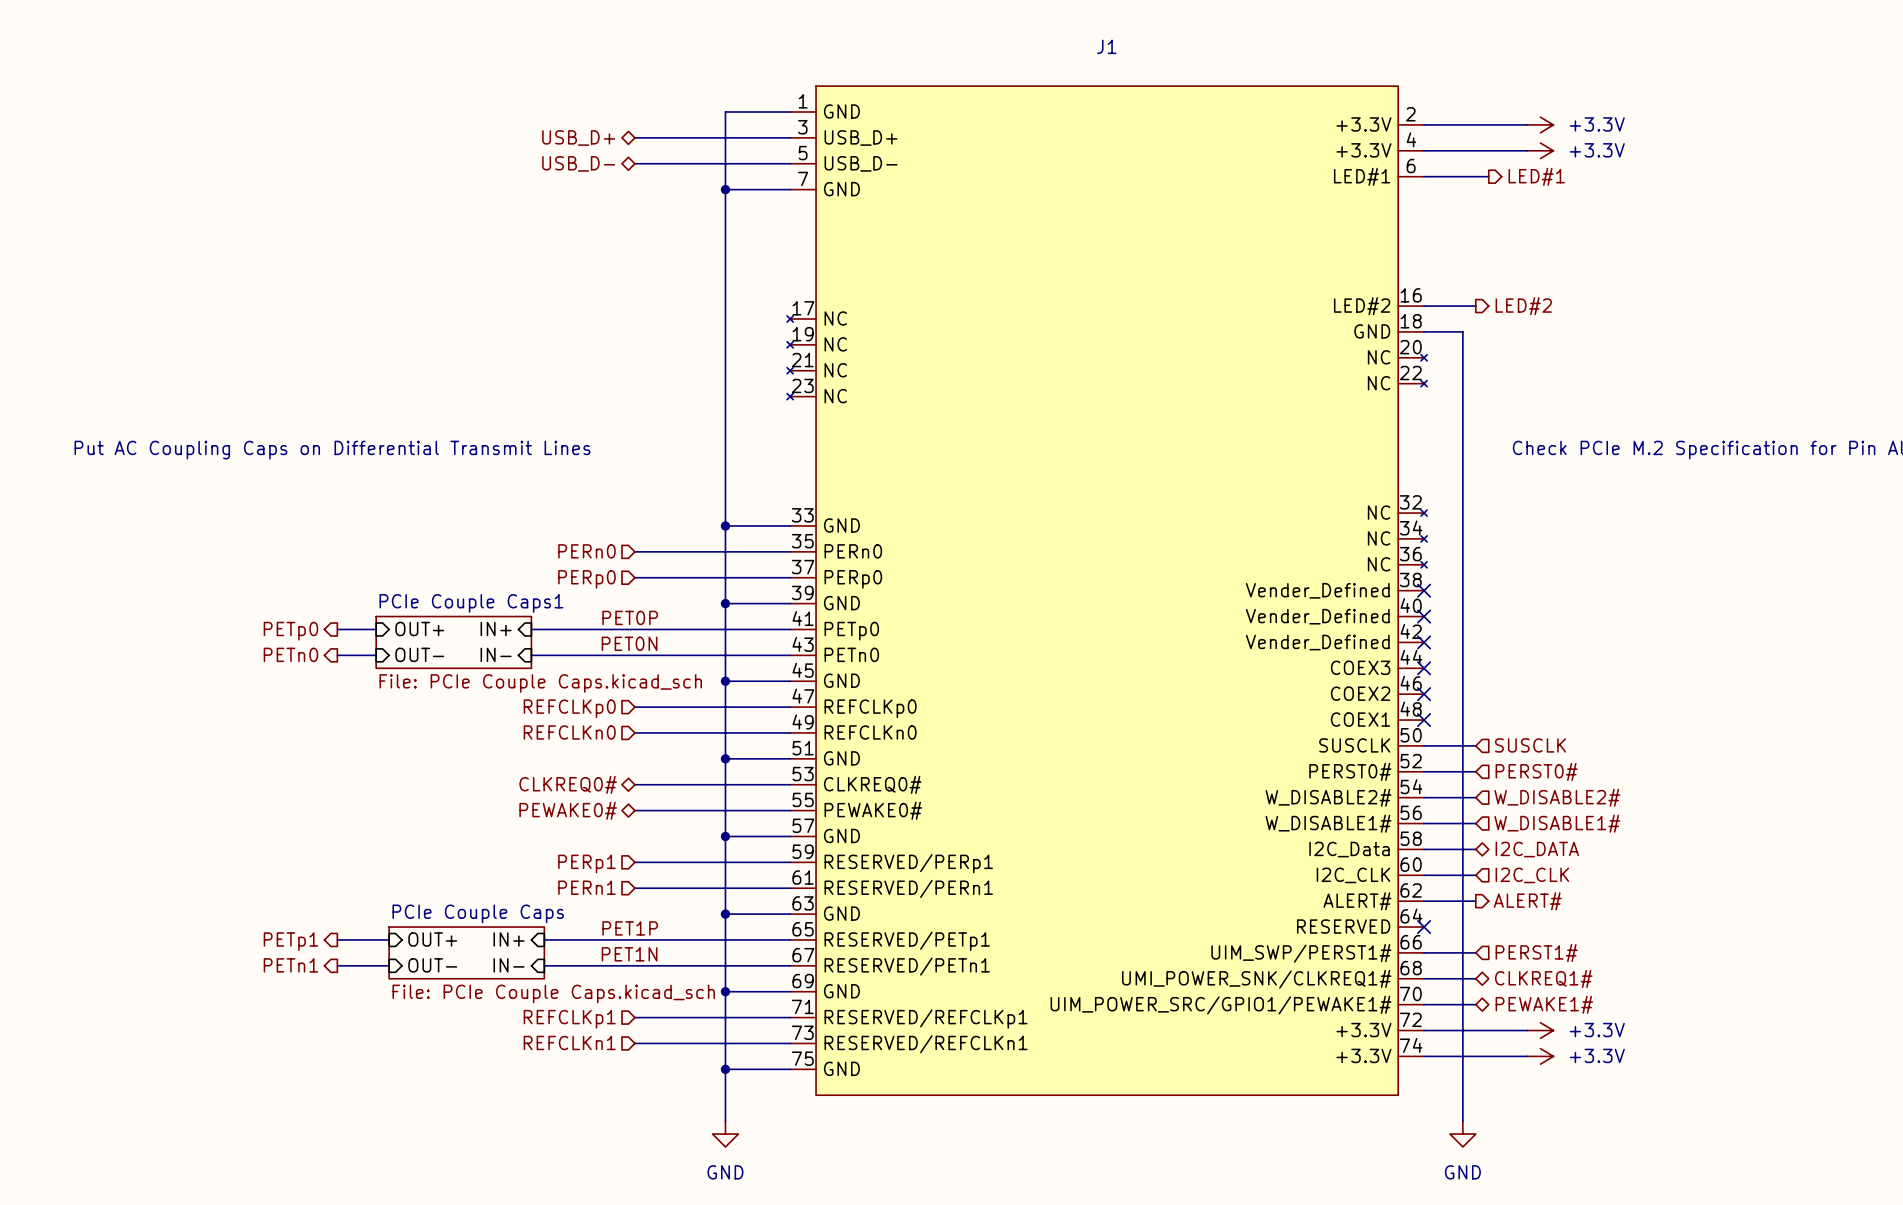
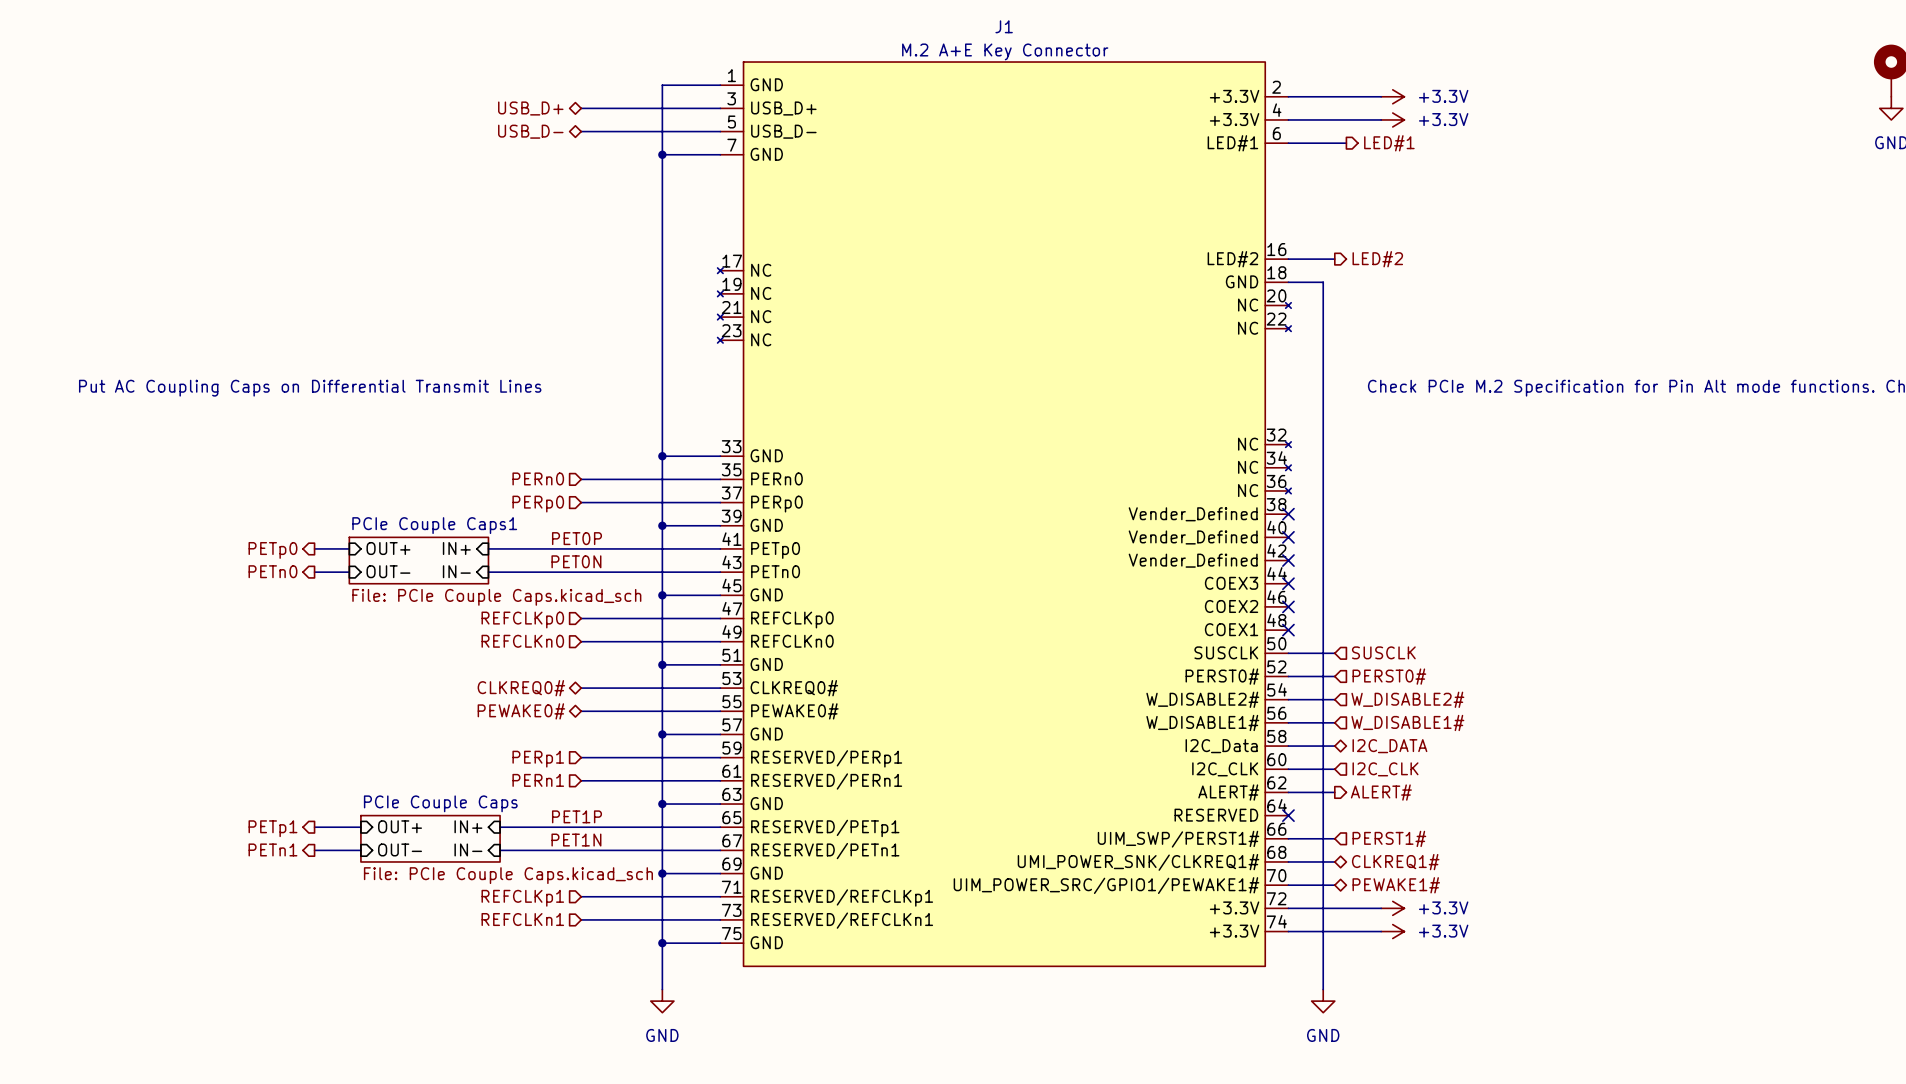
J1 value: none -> M.2 A+E Key Connector (1005, 51)

